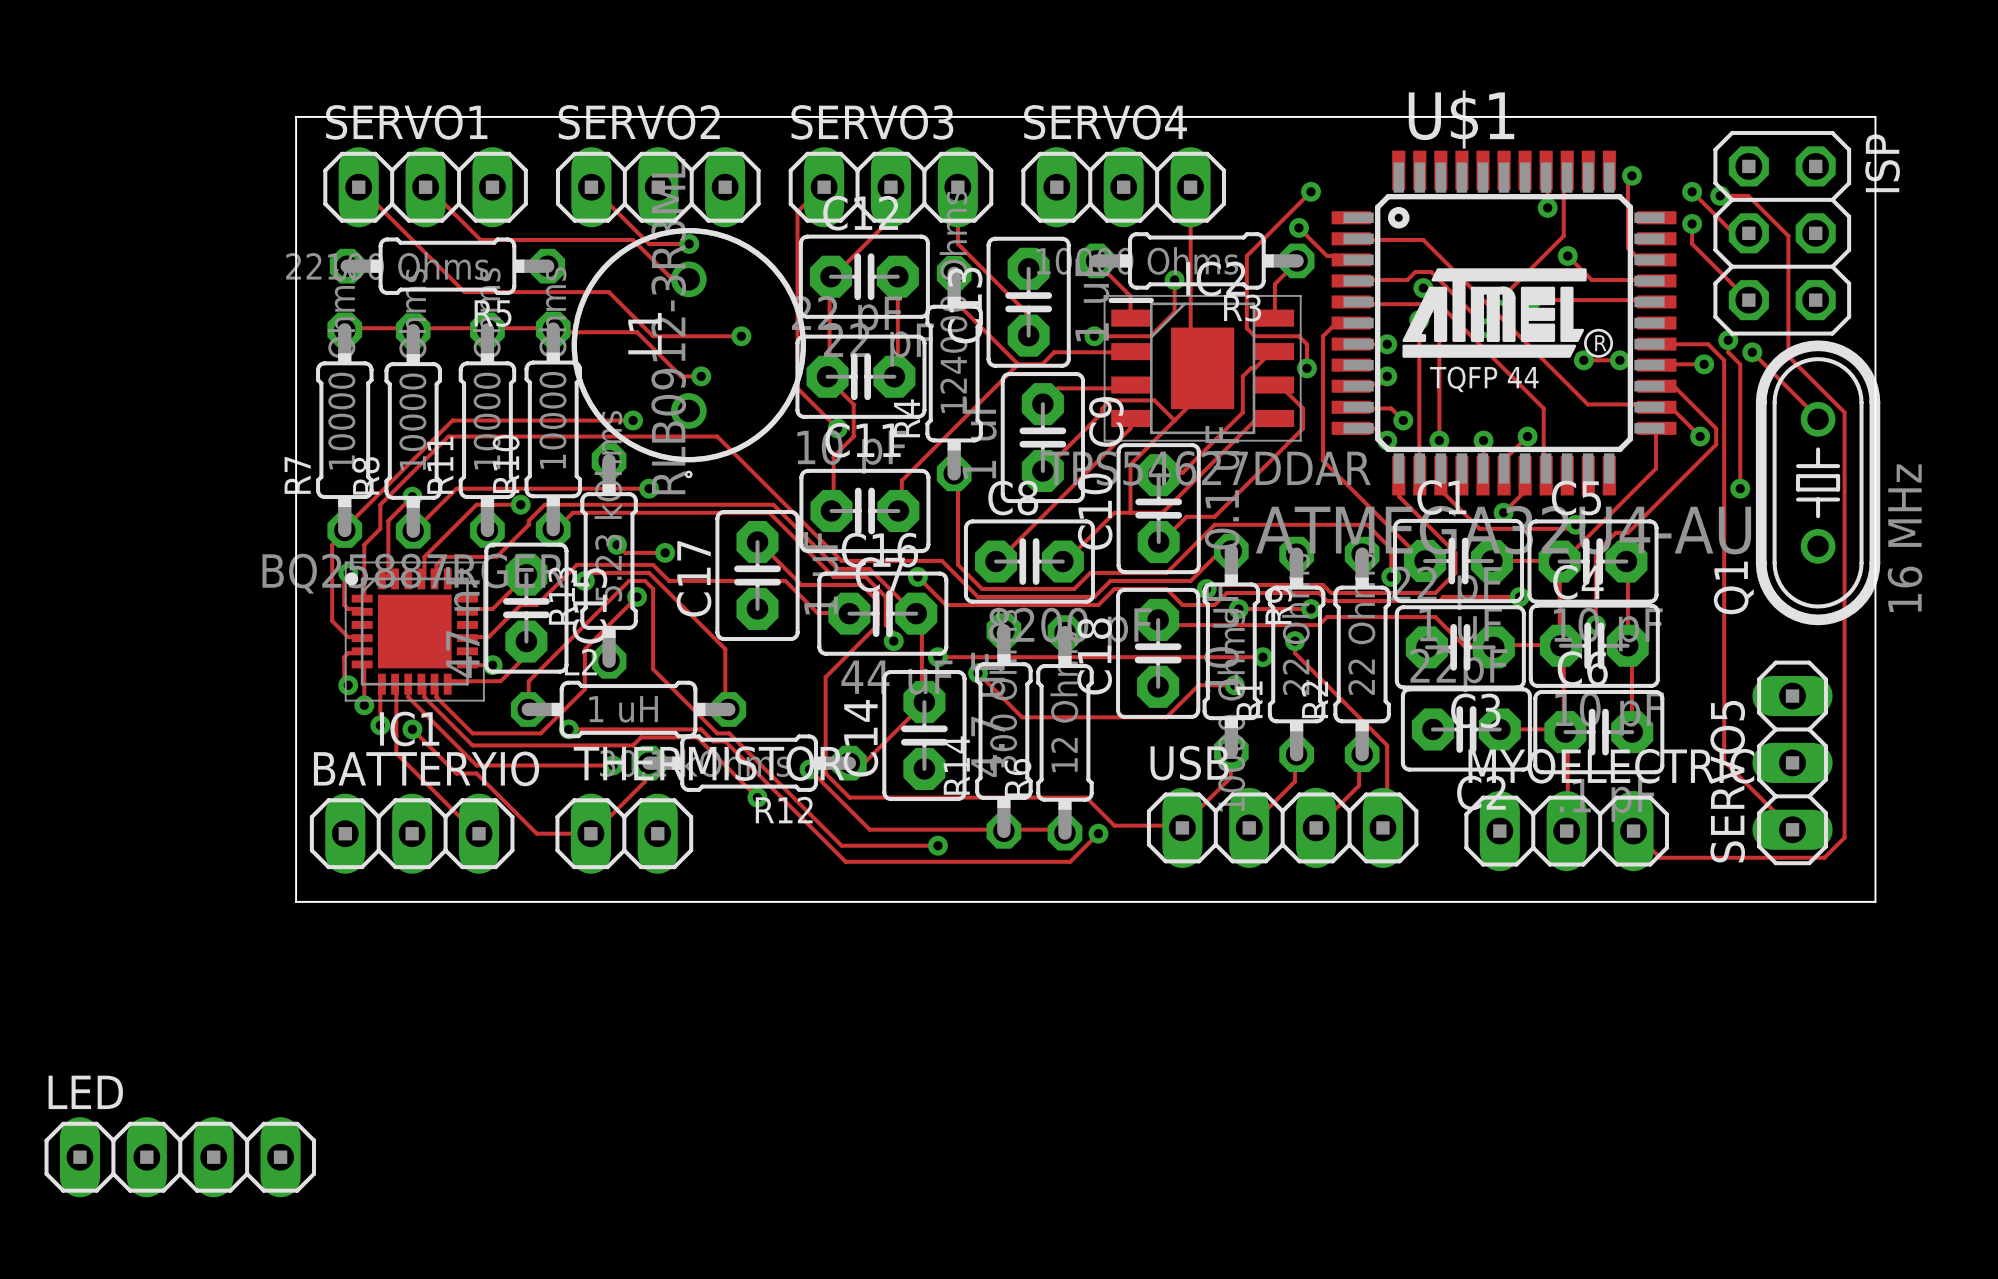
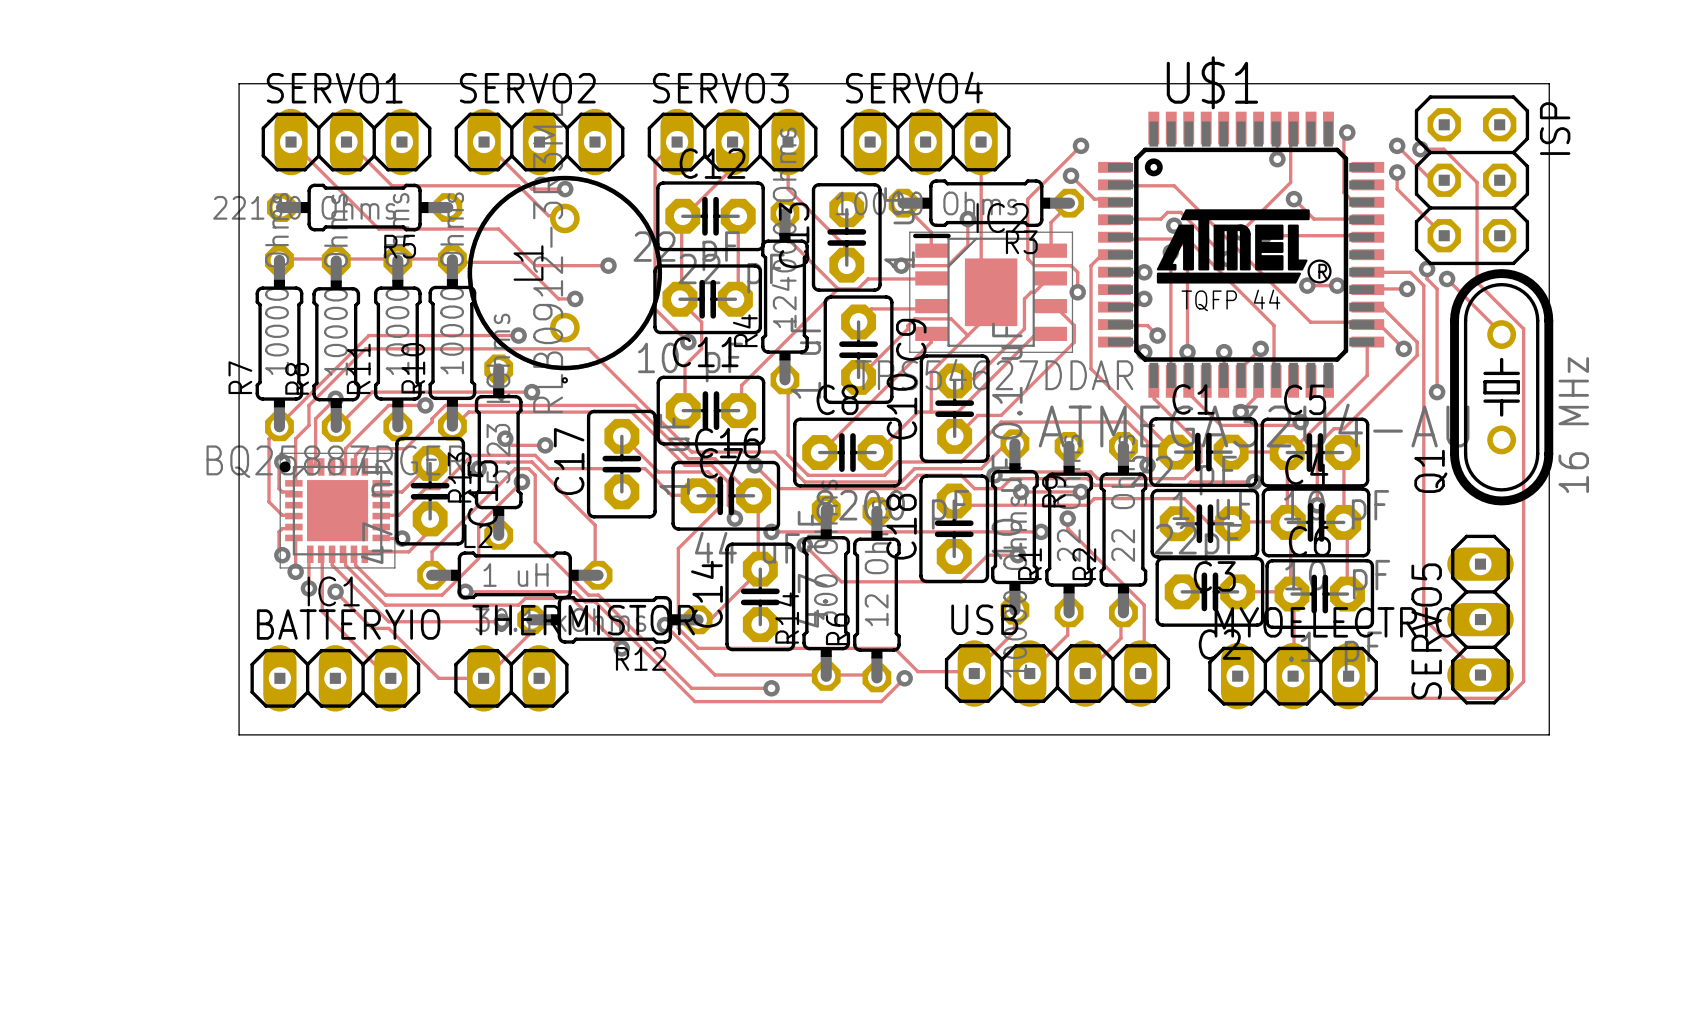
LED: (180, 1157) -> none

